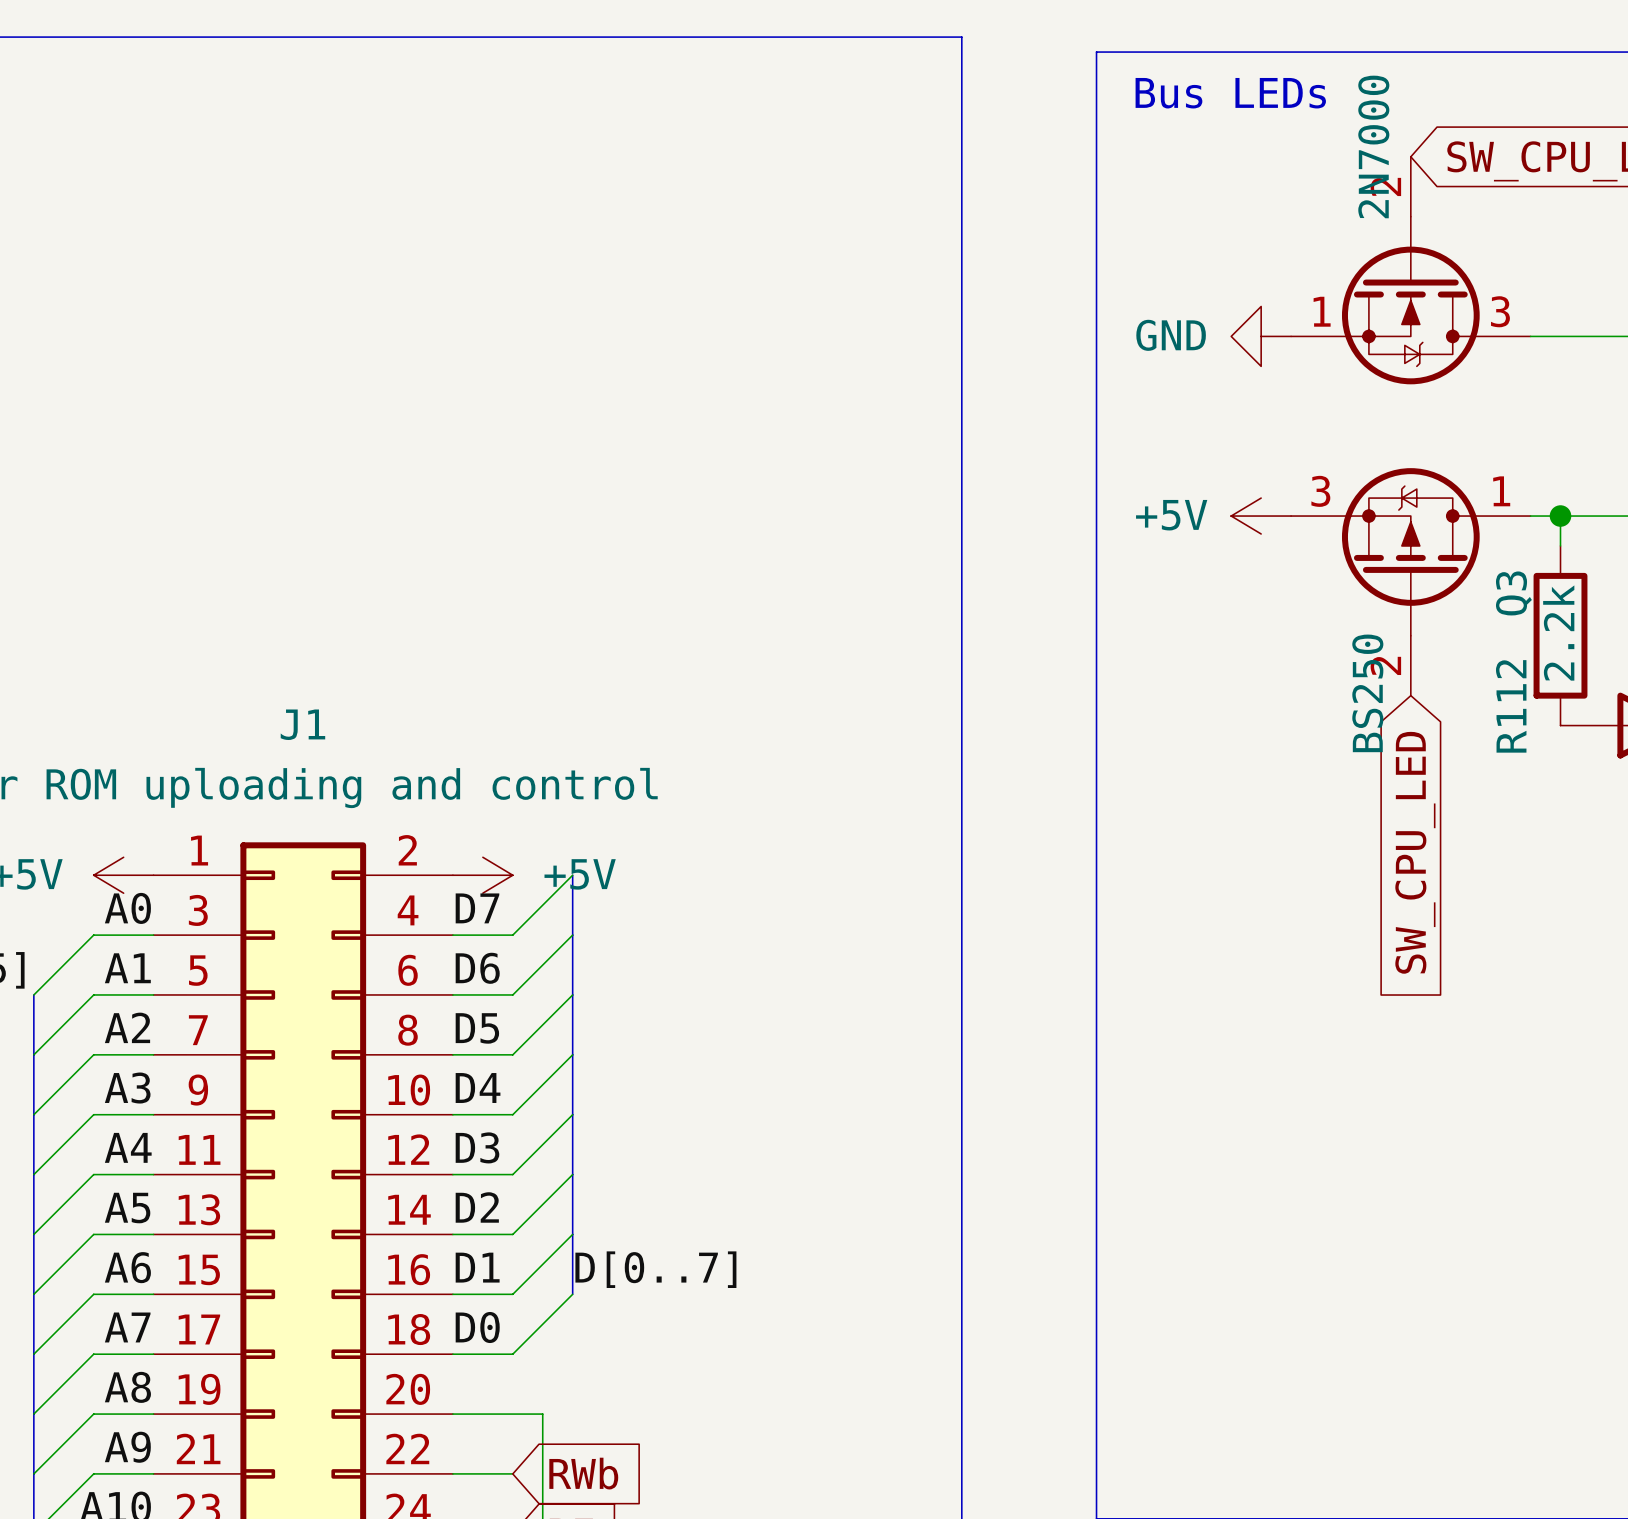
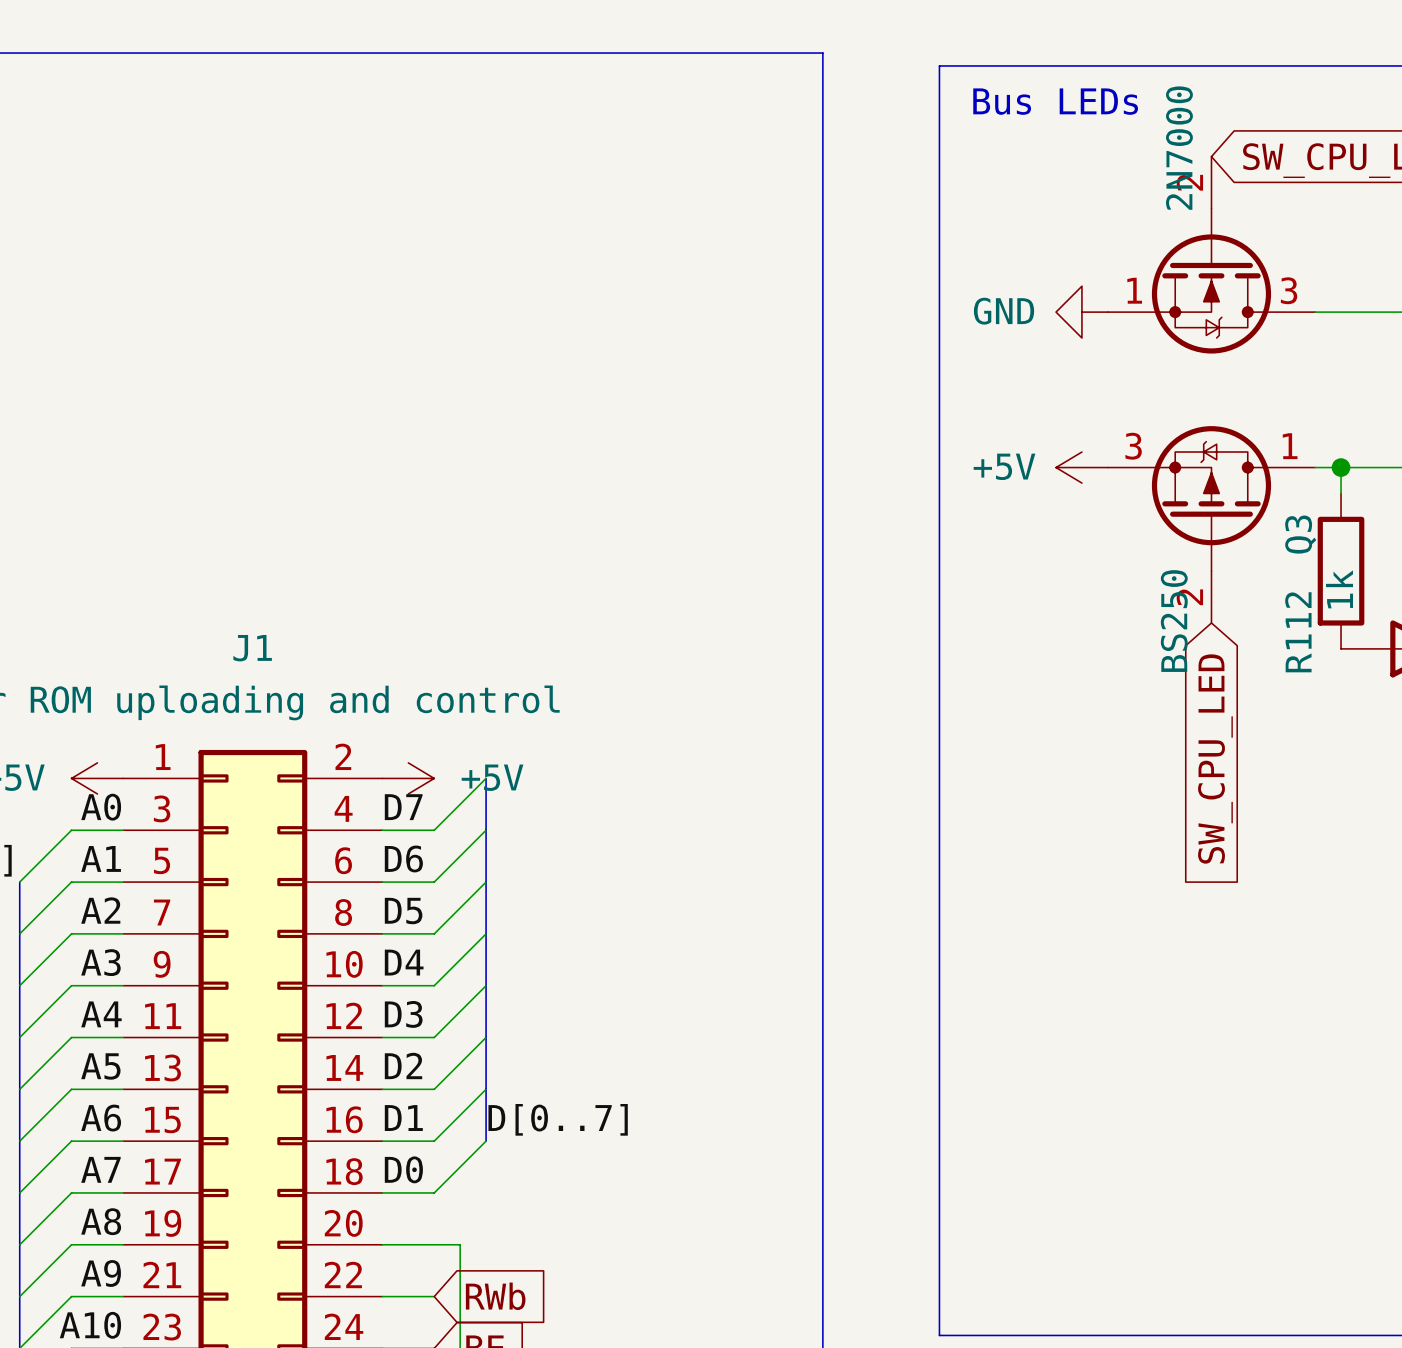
R112 value: 2.2k (1558, 633) -> 1k (1339, 589)

